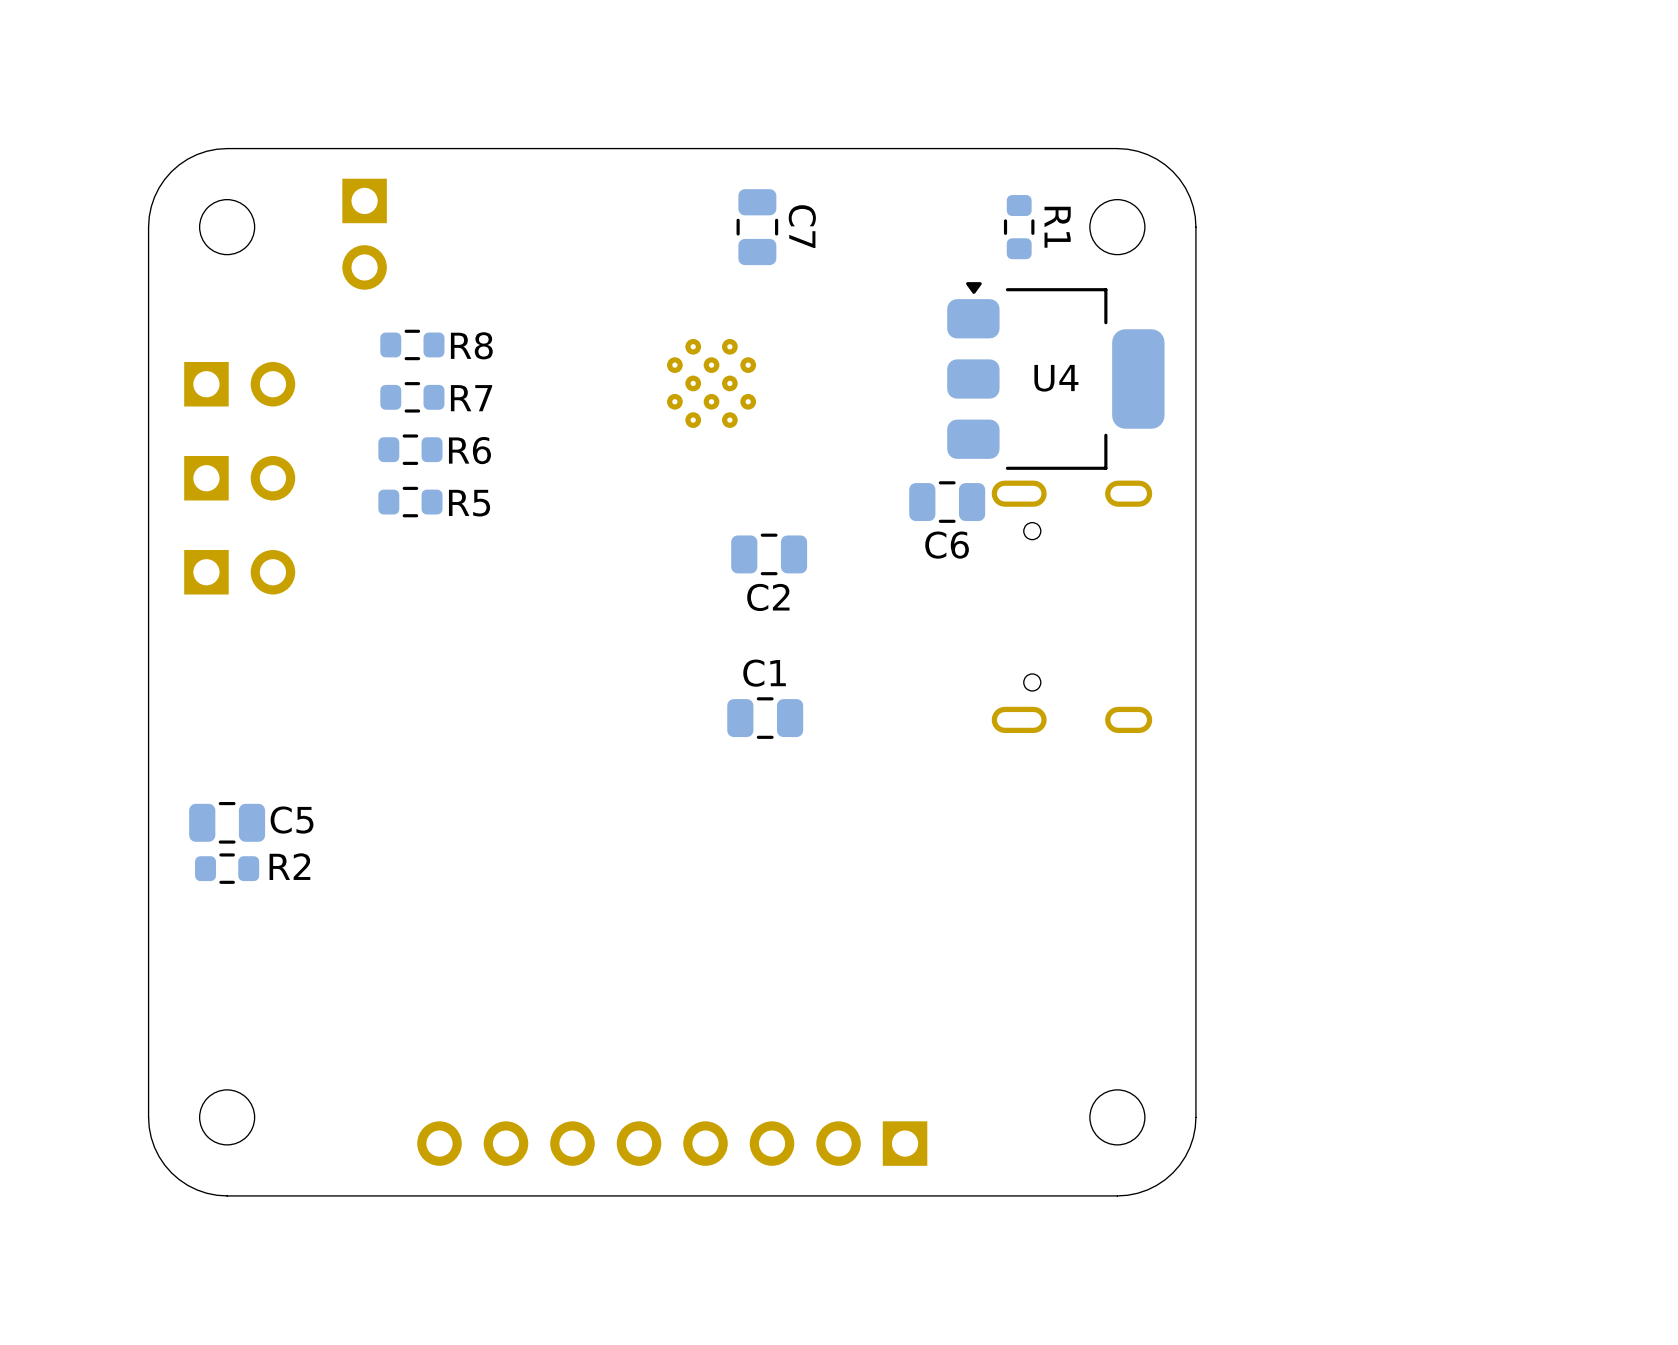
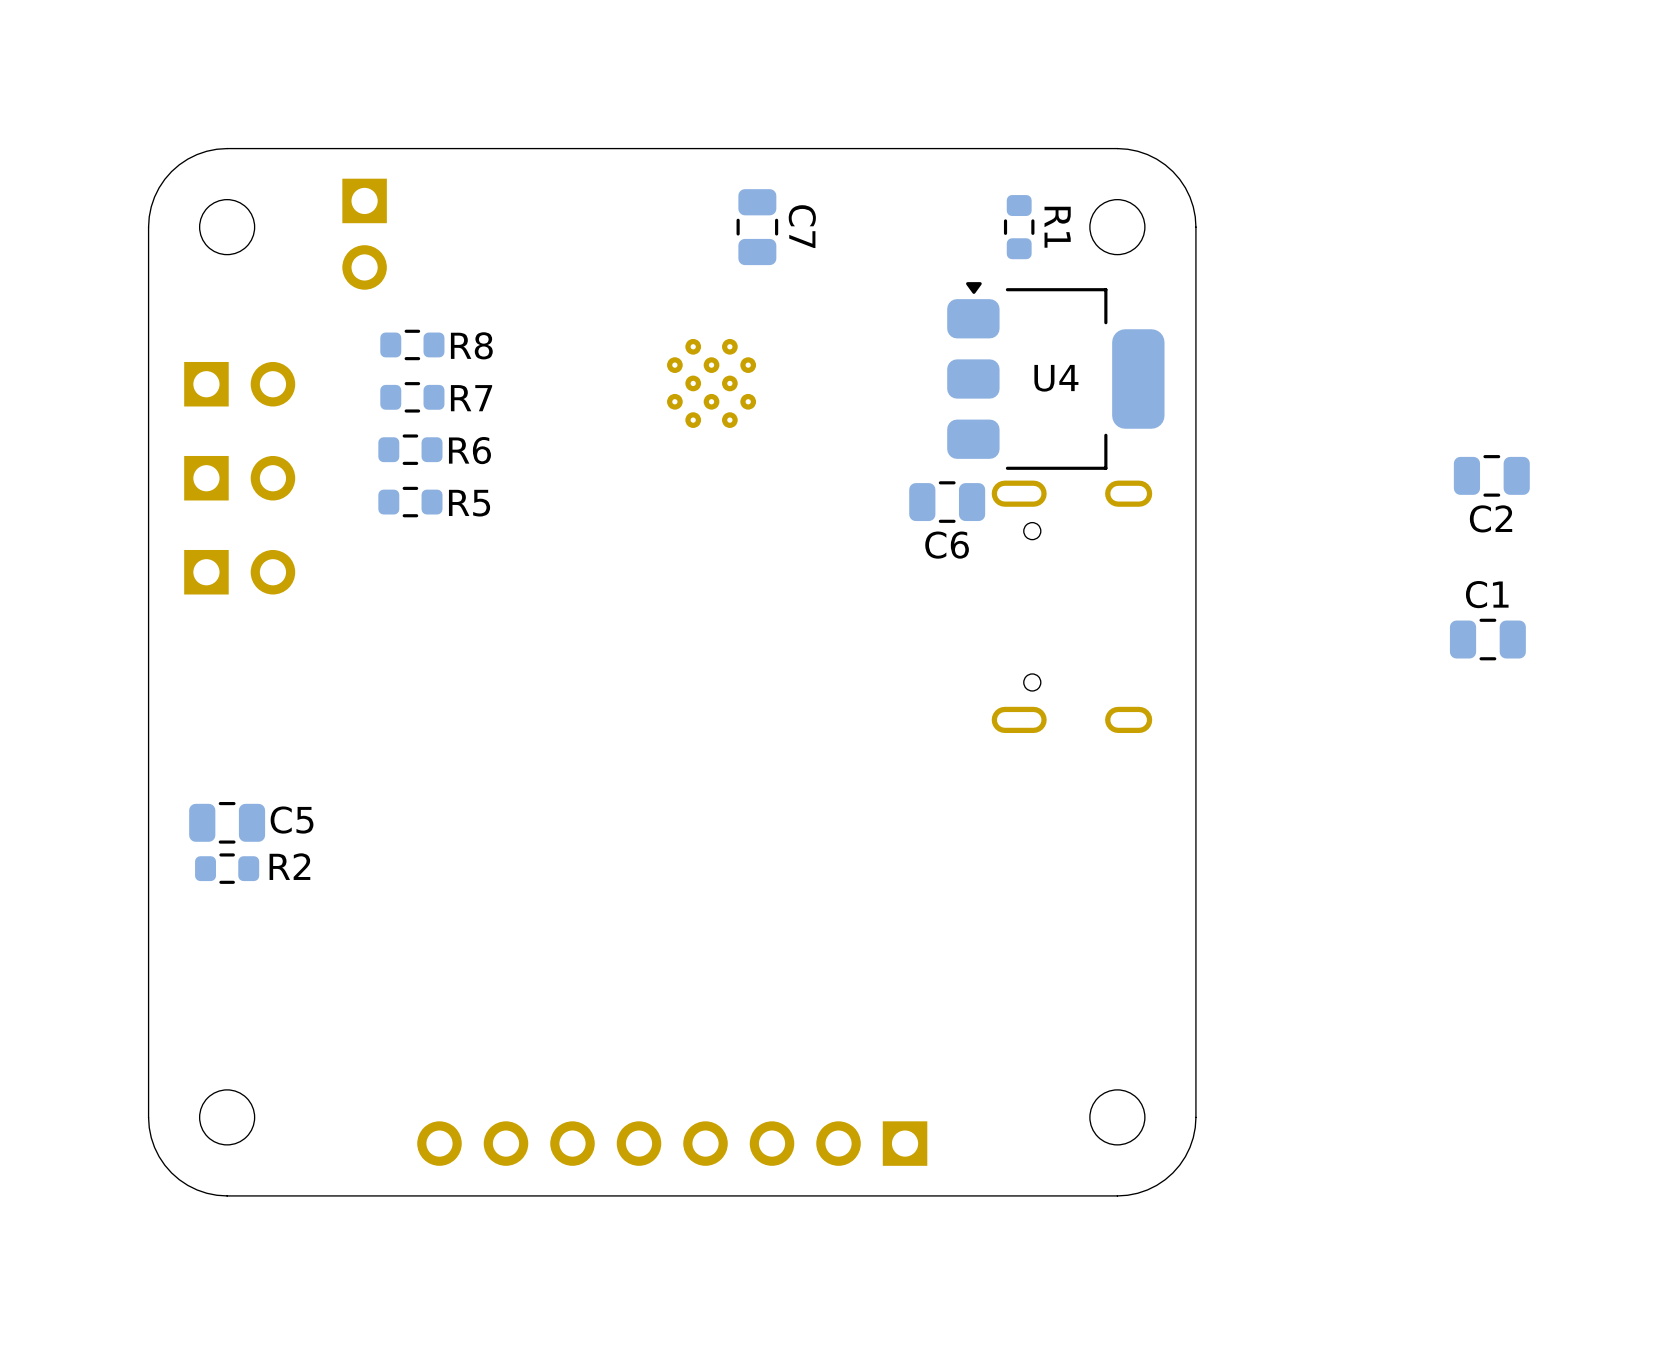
C2 position: (769, 554) -> (1491, 475)
C1 position: (765, 718) -> (1487, 639)

